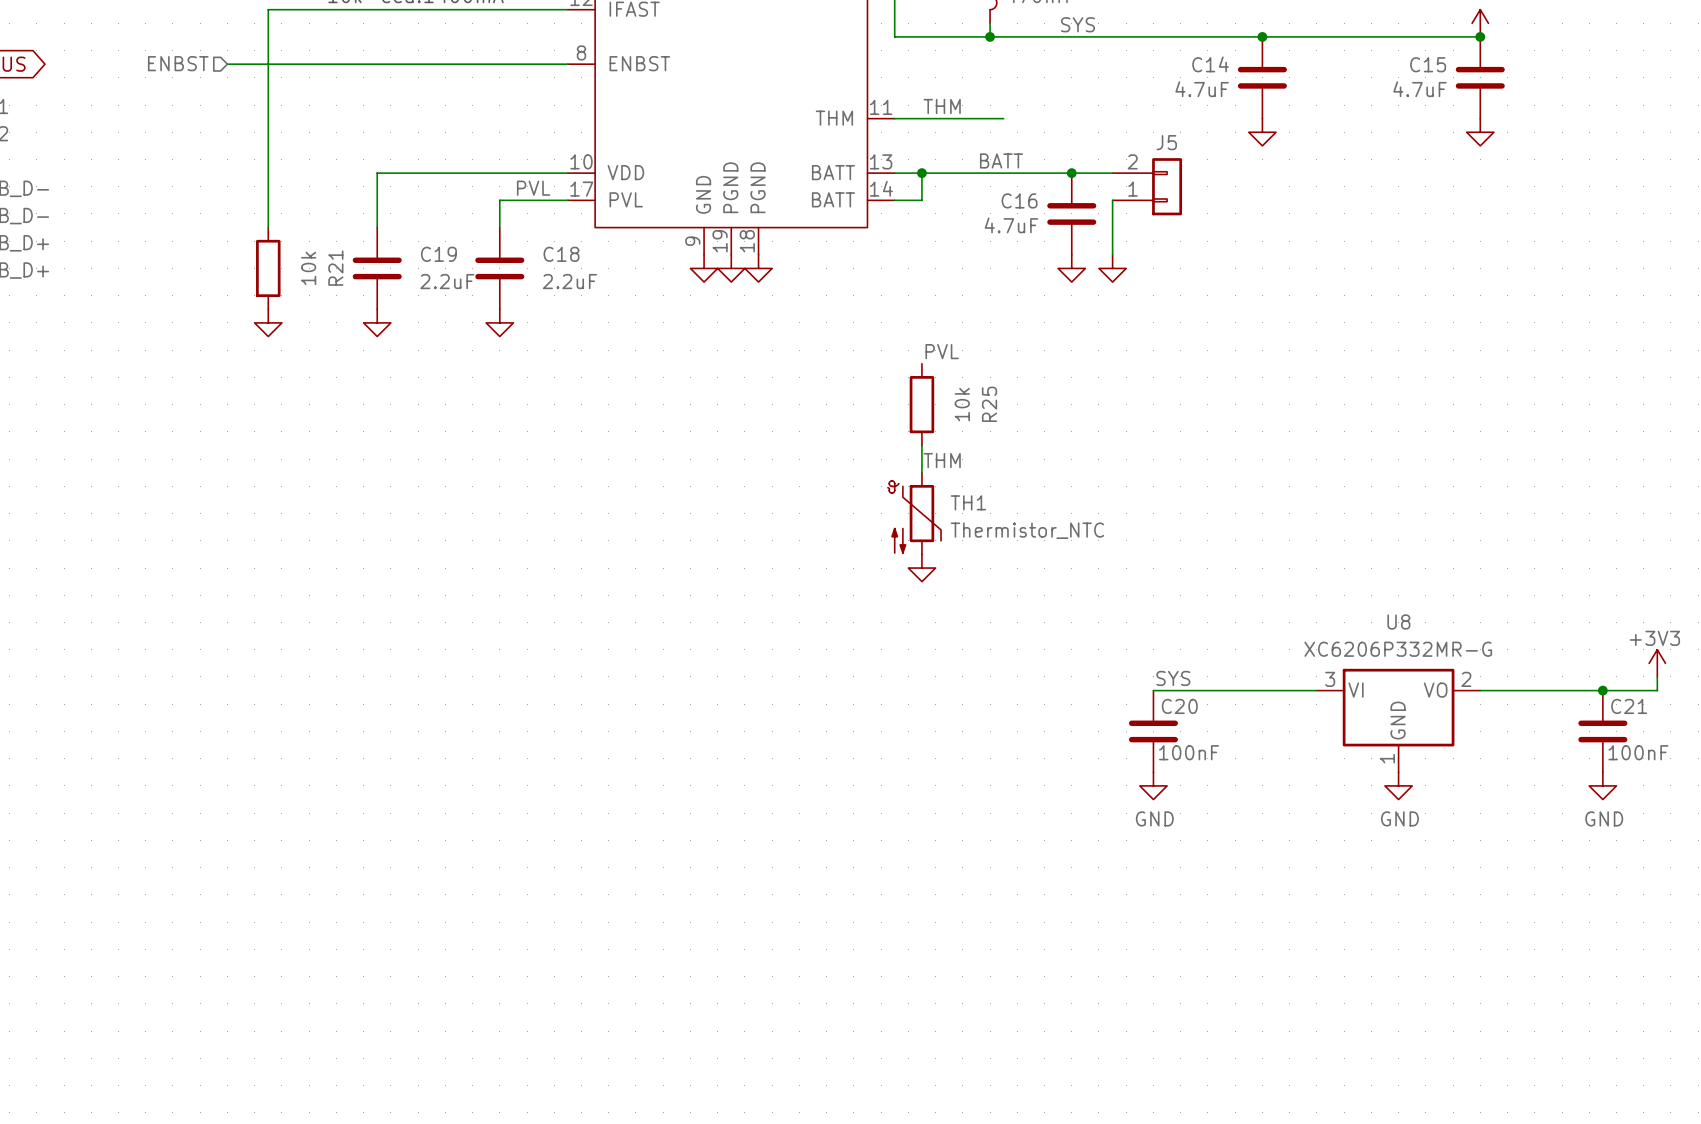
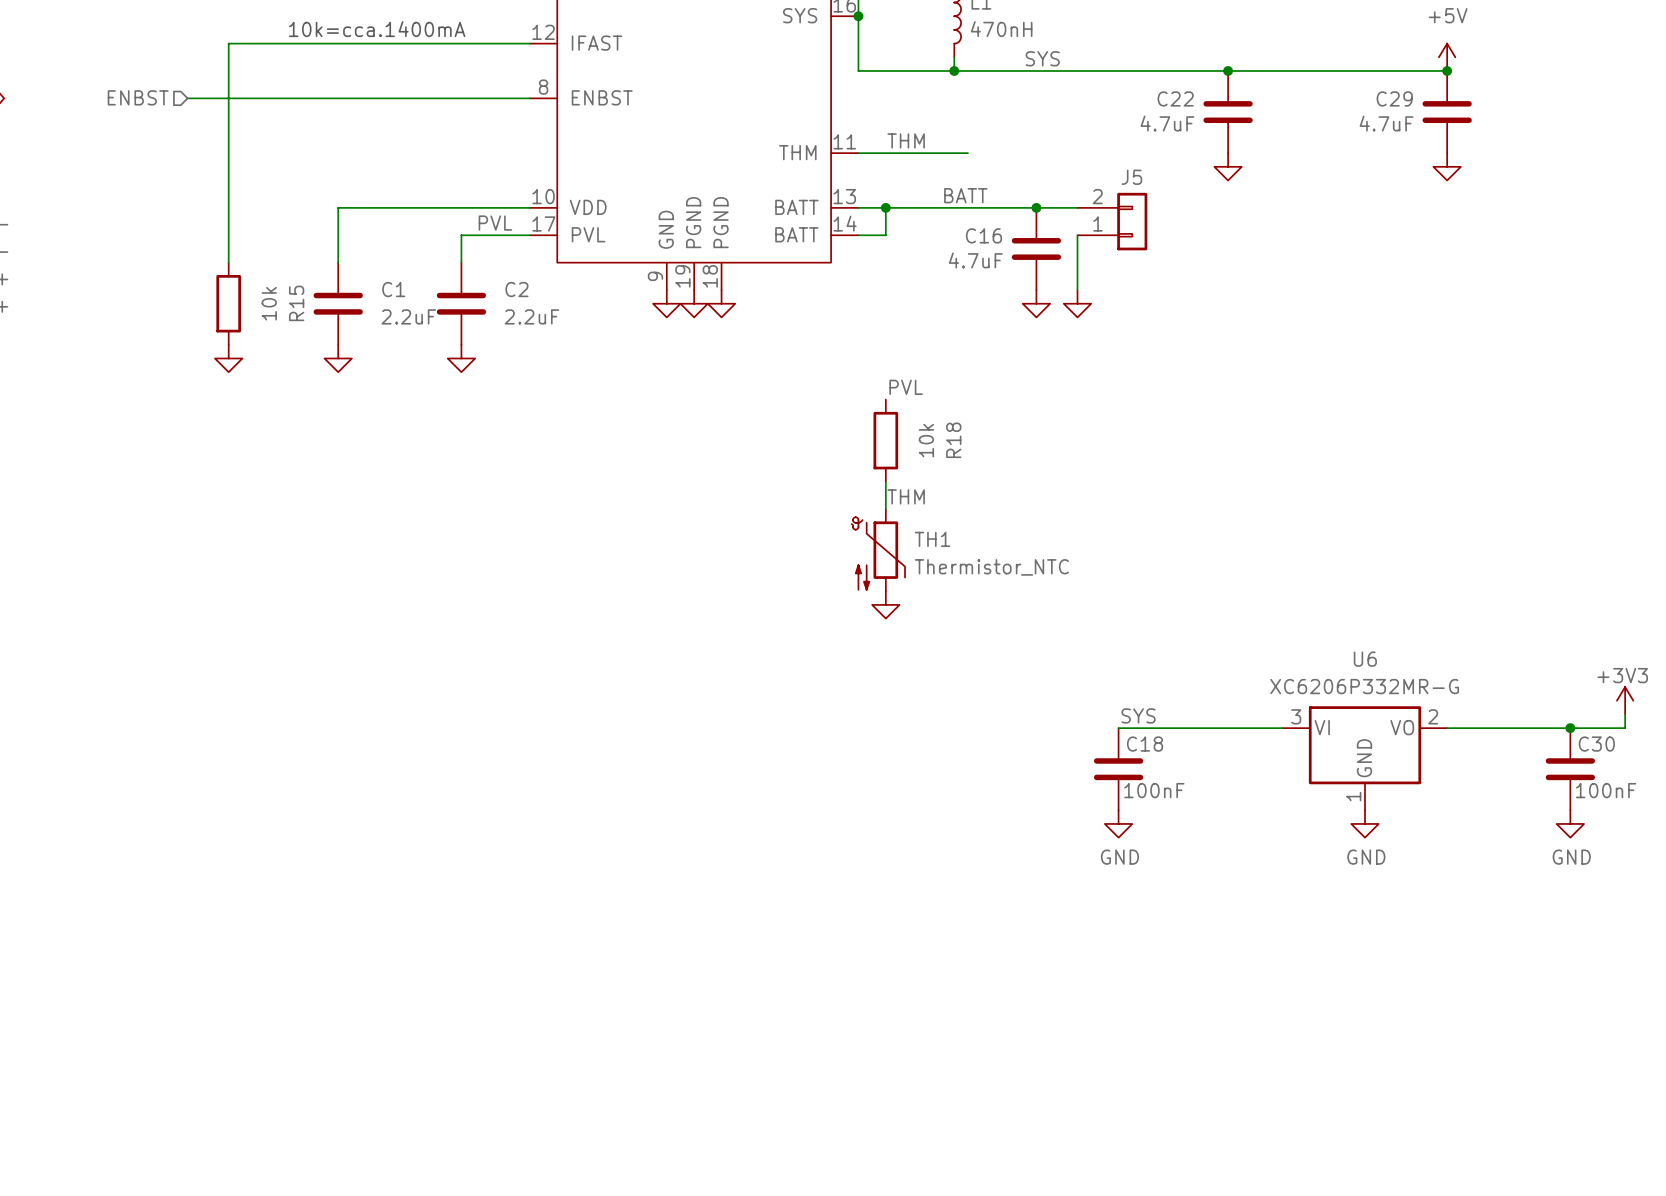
C14 name: C14 (1210, 64) -> C22 (1175, 98)
C15 name: C15 (1428, 64) -> C29 (1394, 98)
C19 name: C19 (438, 254) -> C1 (393, 289)
C18 name: C18 (561, 254) -> C2 (516, 289)
R21 name: R21 (335, 268) -> R15 (296, 303)
R25 name: R25 (989, 404) -> R18 (953, 440)
U8 name: U8 (1398, 622) -> U6 (1365, 659)
C20 name: C20 (1179, 706) -> C18 (1145, 744)
C21 name: C21 (1629, 706) -> C30 (1596, 744)

